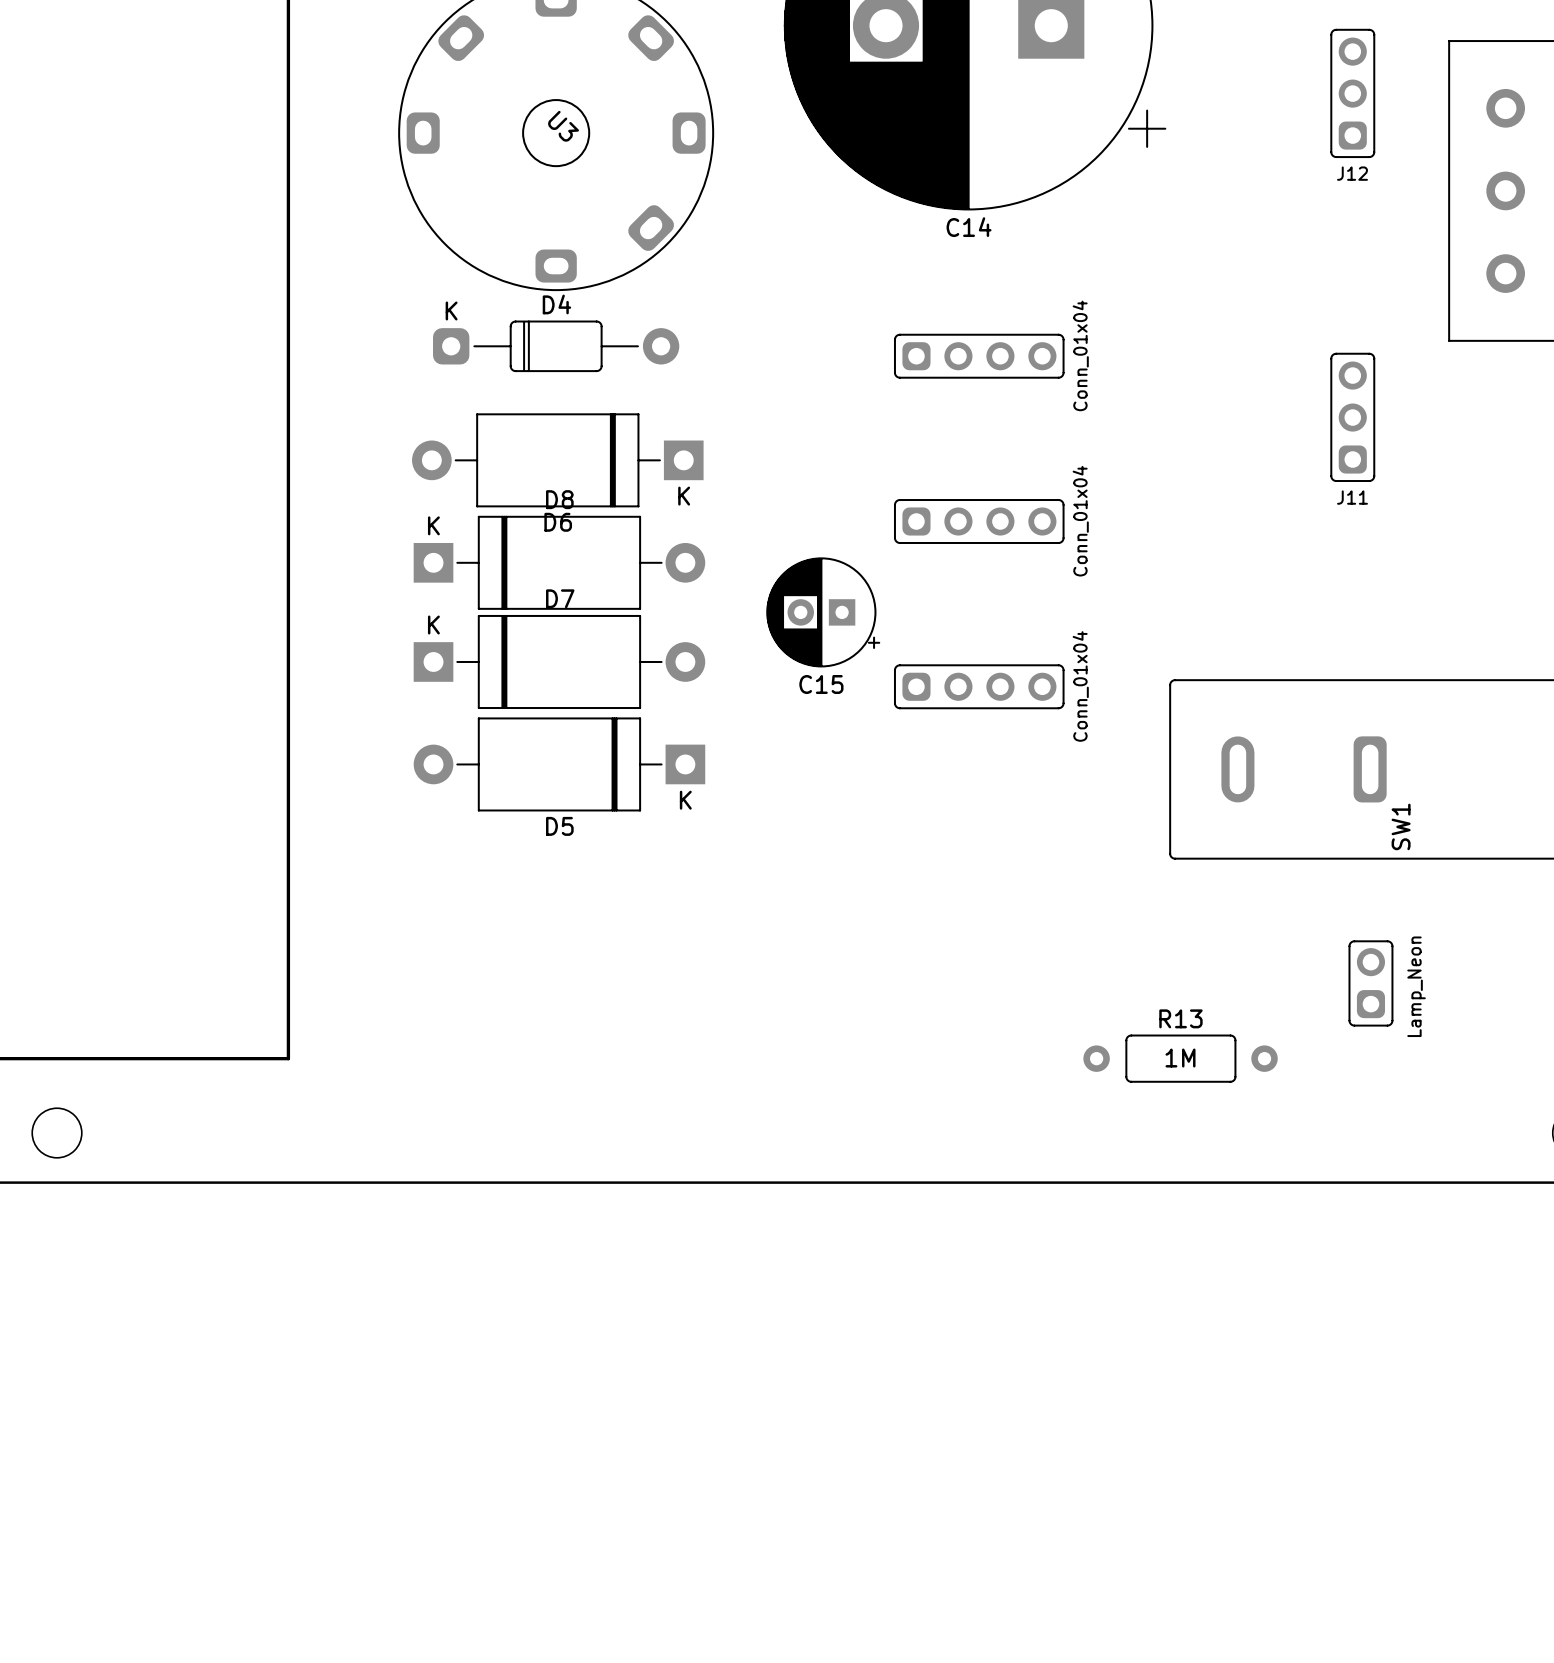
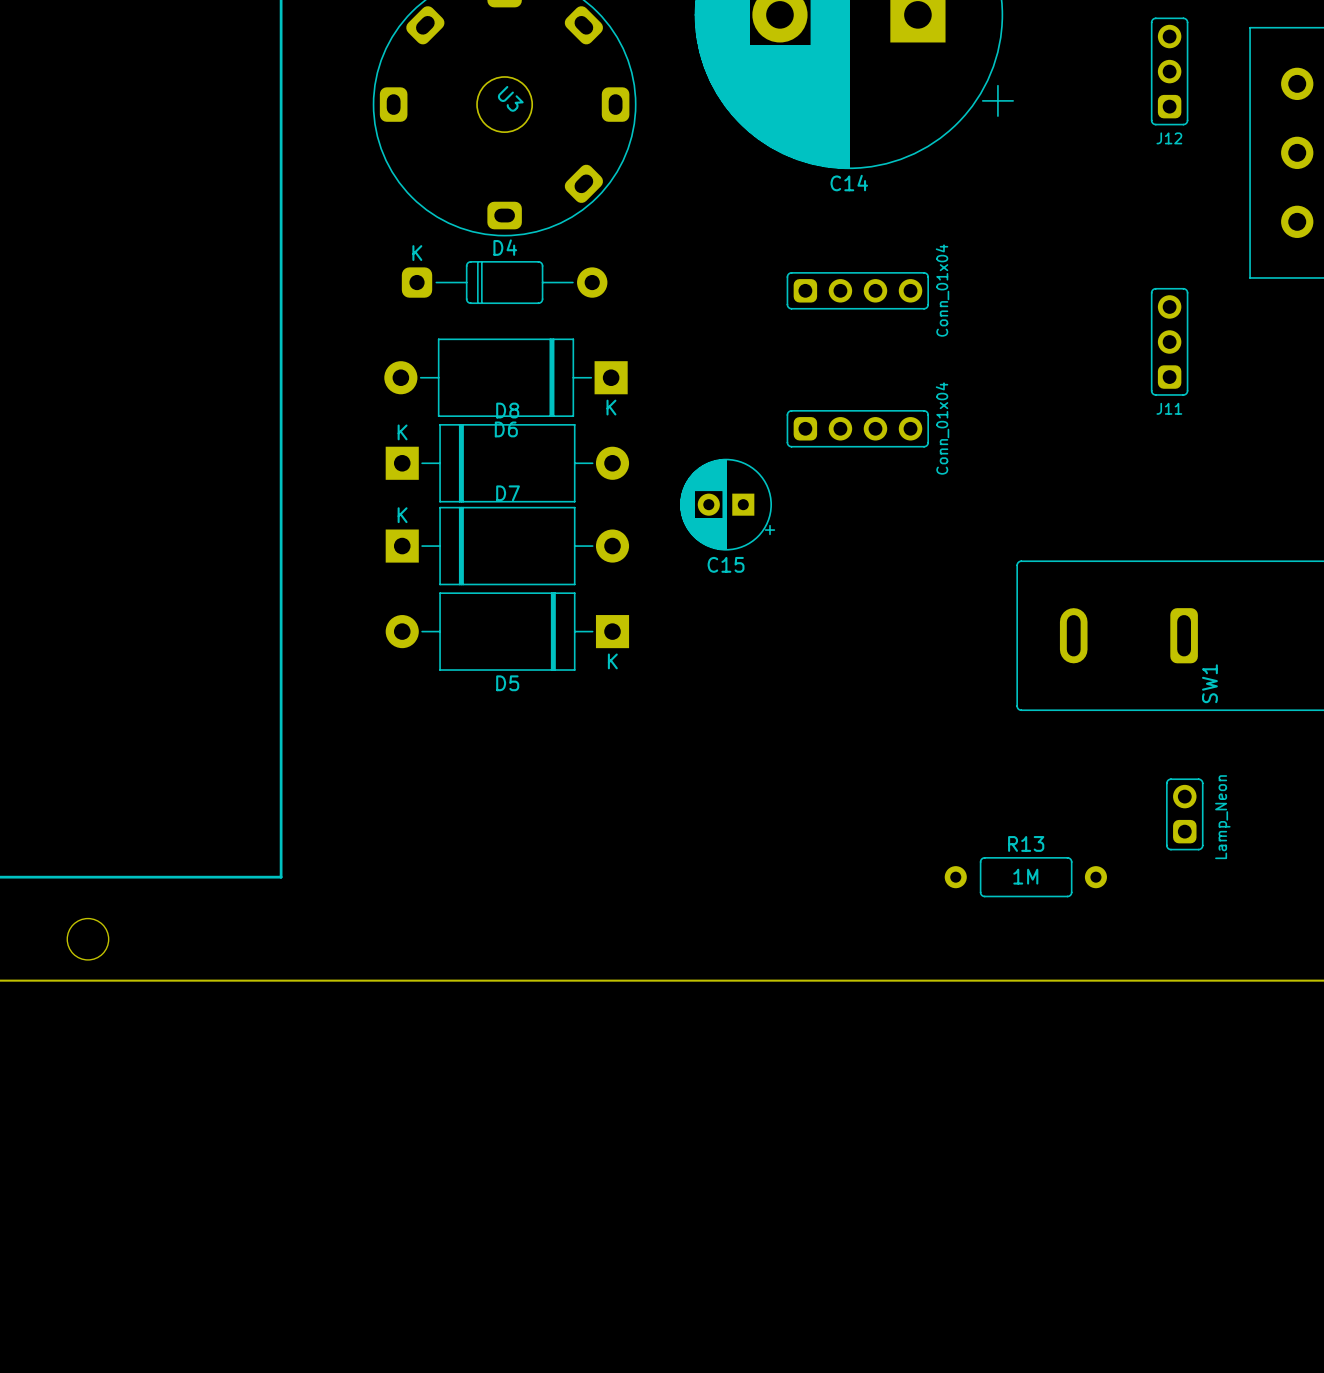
part: Conn_01x04 (979, 686) -> none

